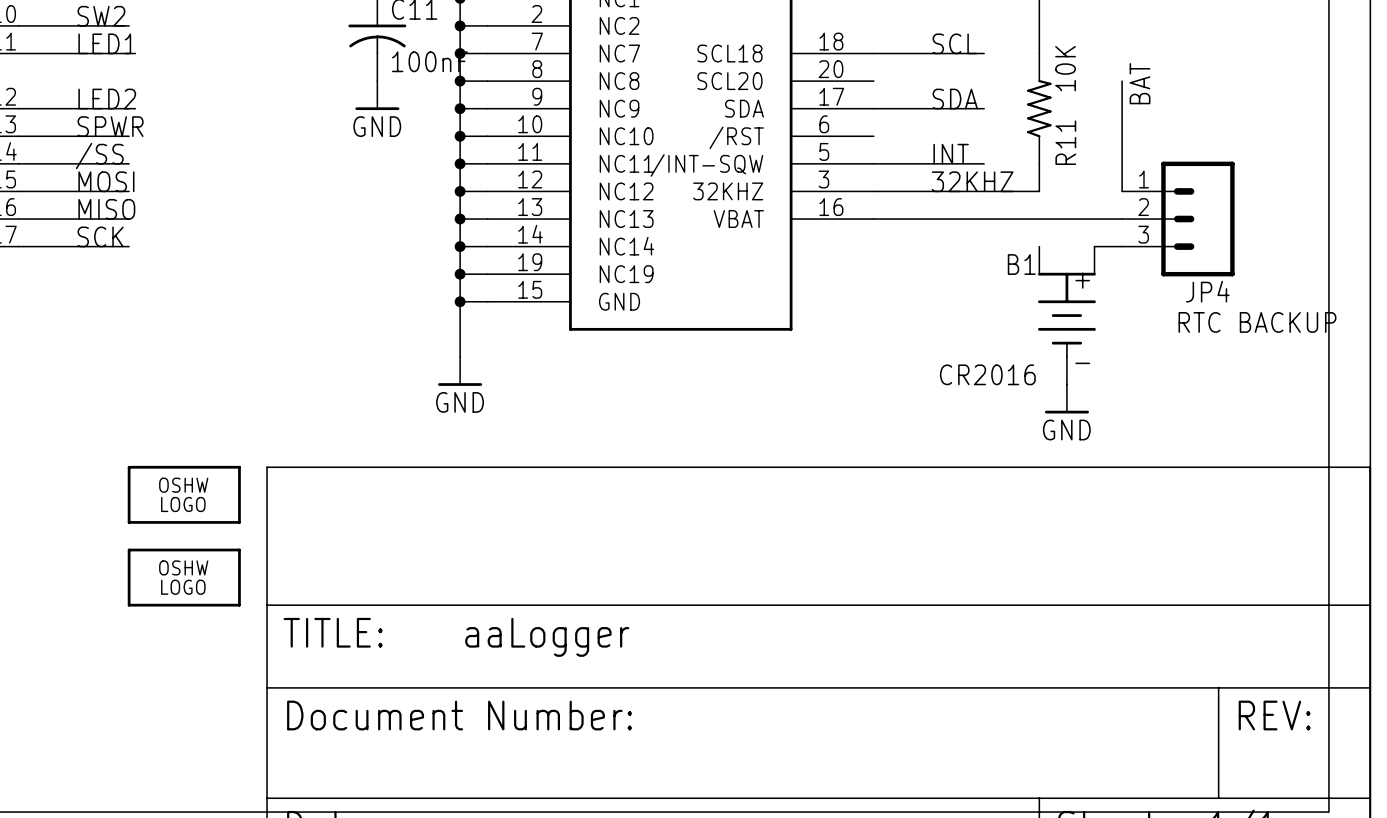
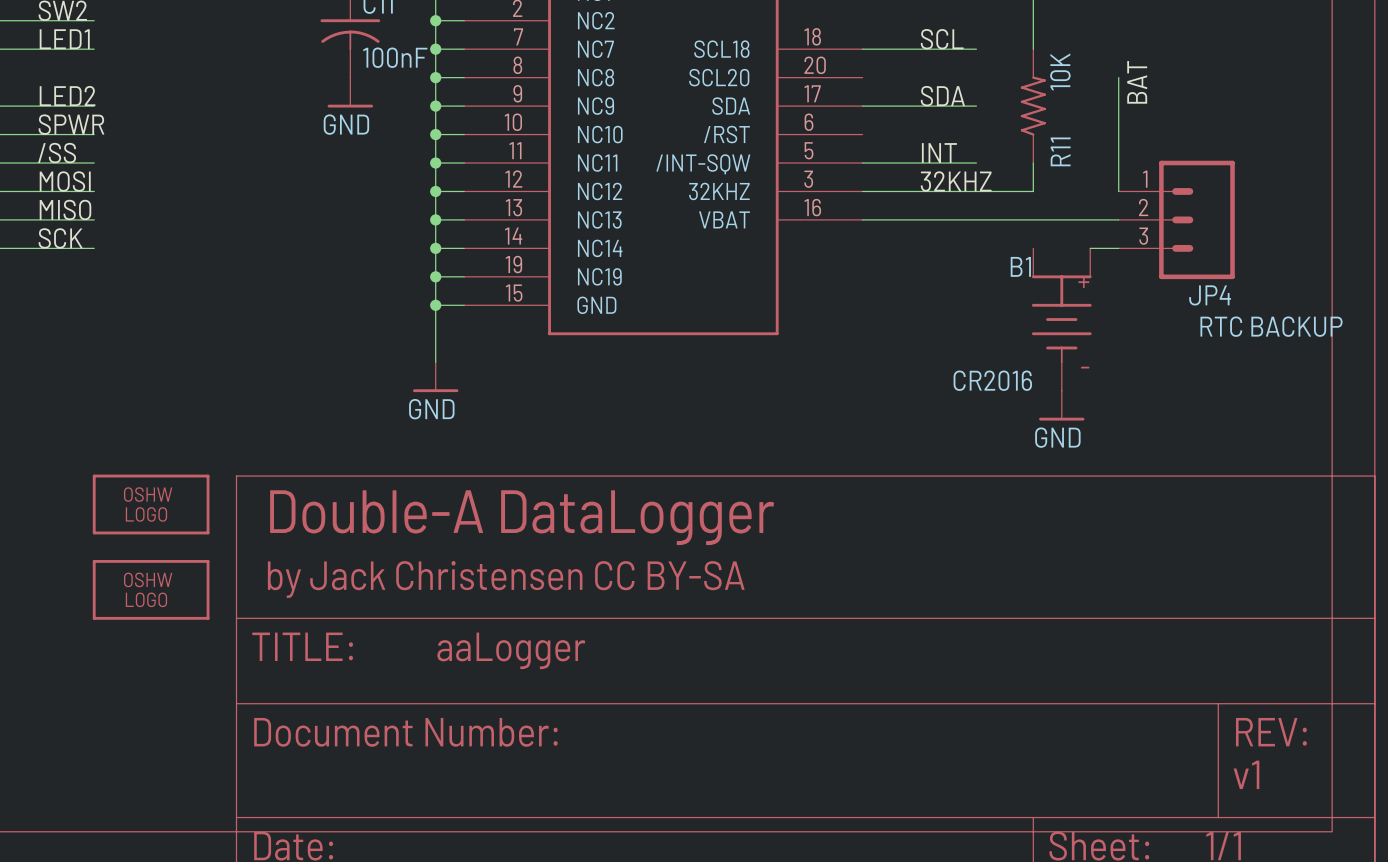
text: none -> Double-A DataLogger (522, 517)
text: none -> by Jack Christensen CC BY-SA (506, 579)
text: none -> v1 (1246, 774)

